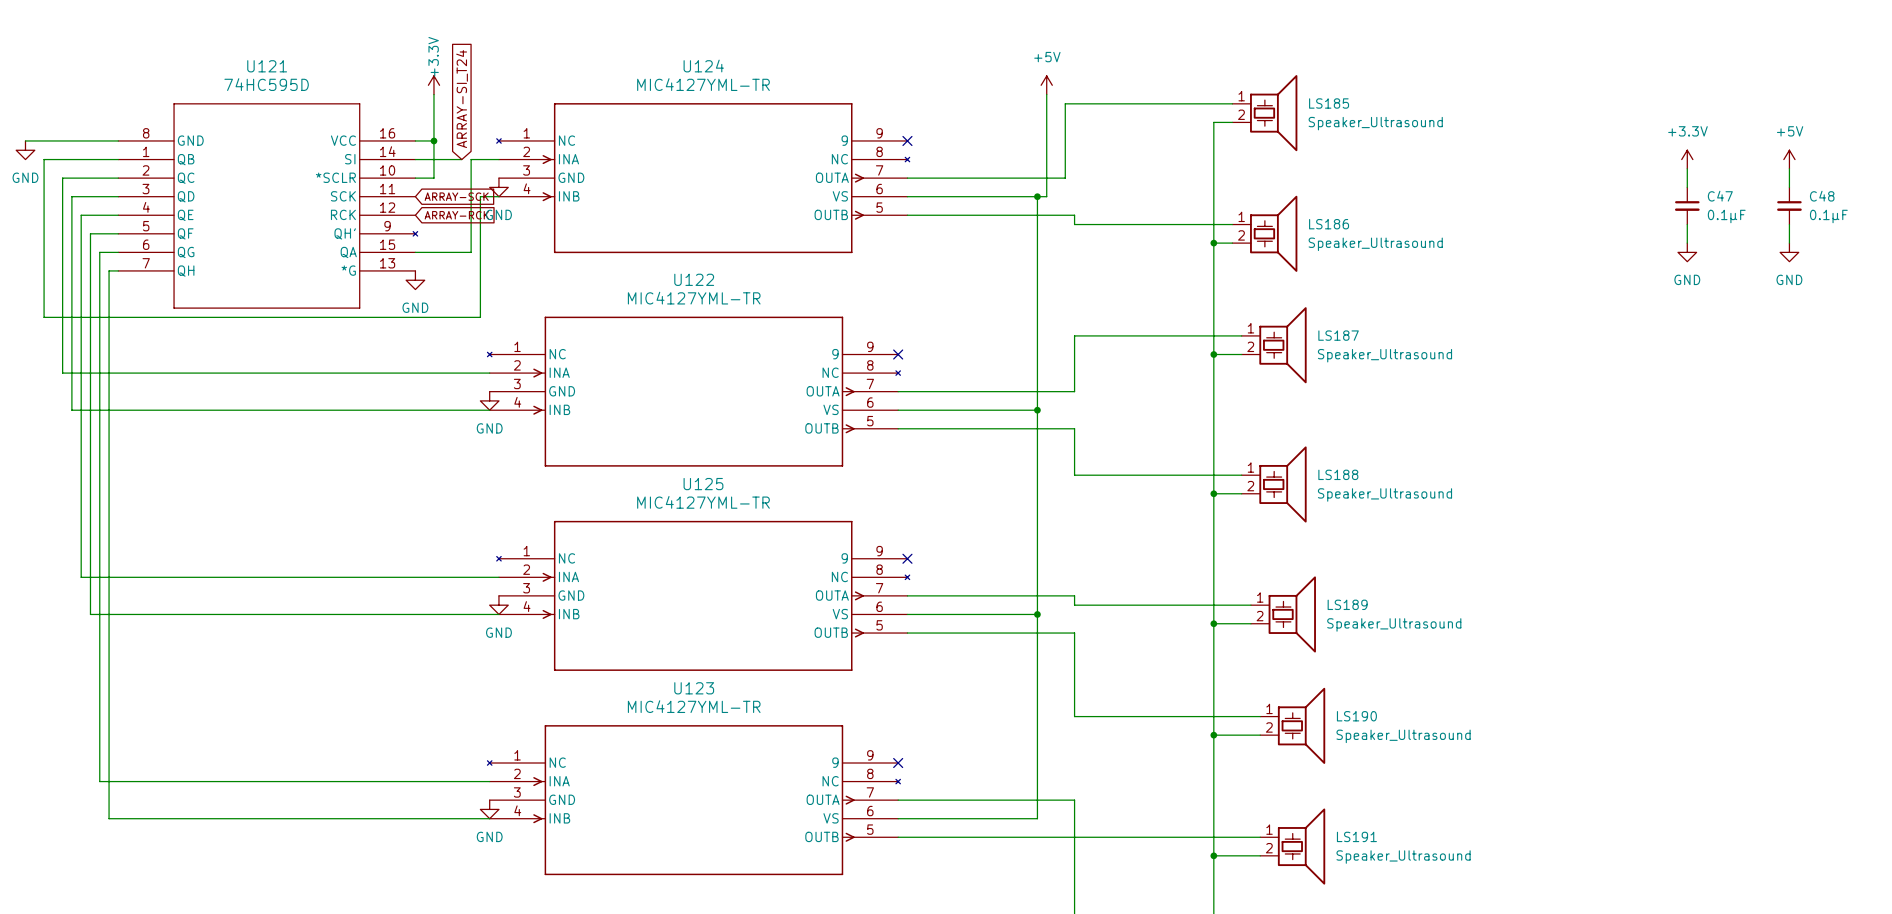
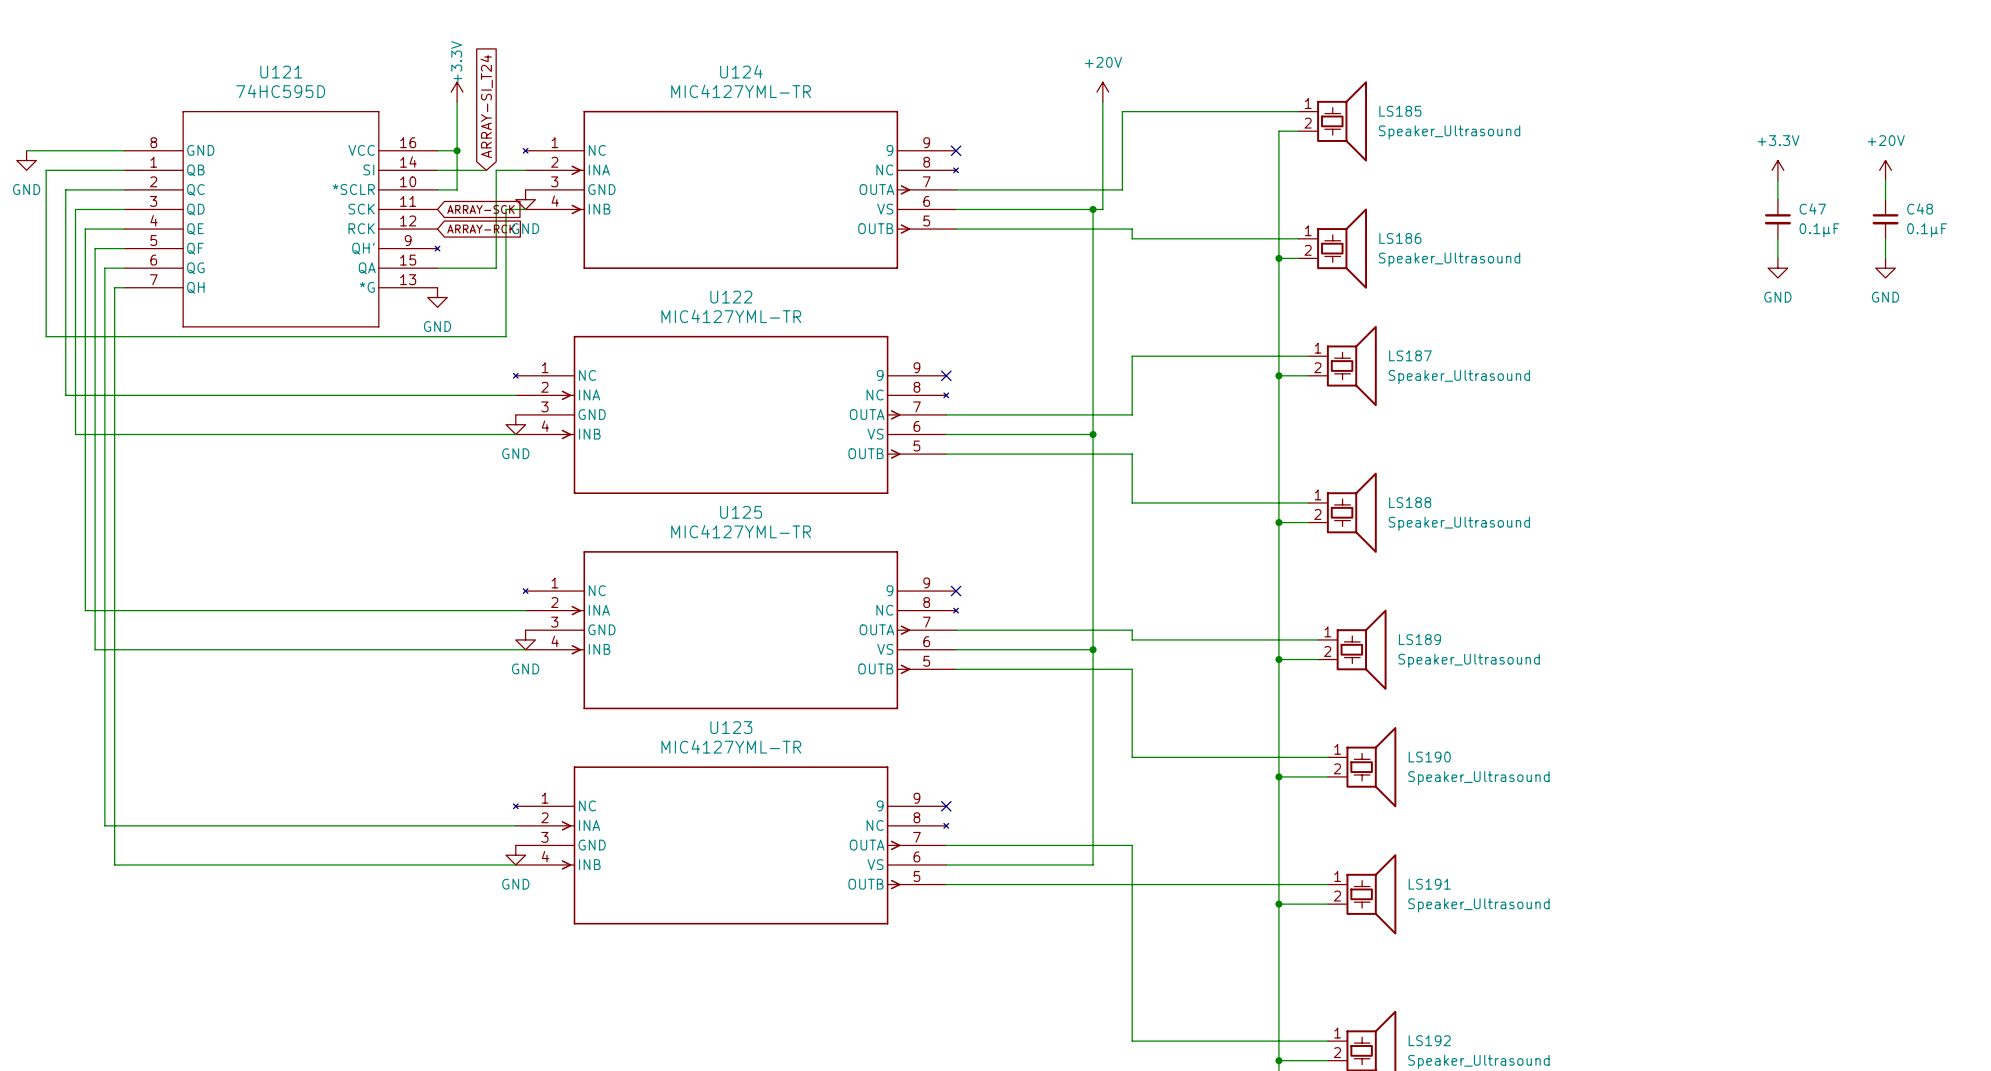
power symbol: +5V (1046, 85) -> +20V (1102, 92)
power symbol: +5V (1789, 159) -> +20V (1885, 170)

